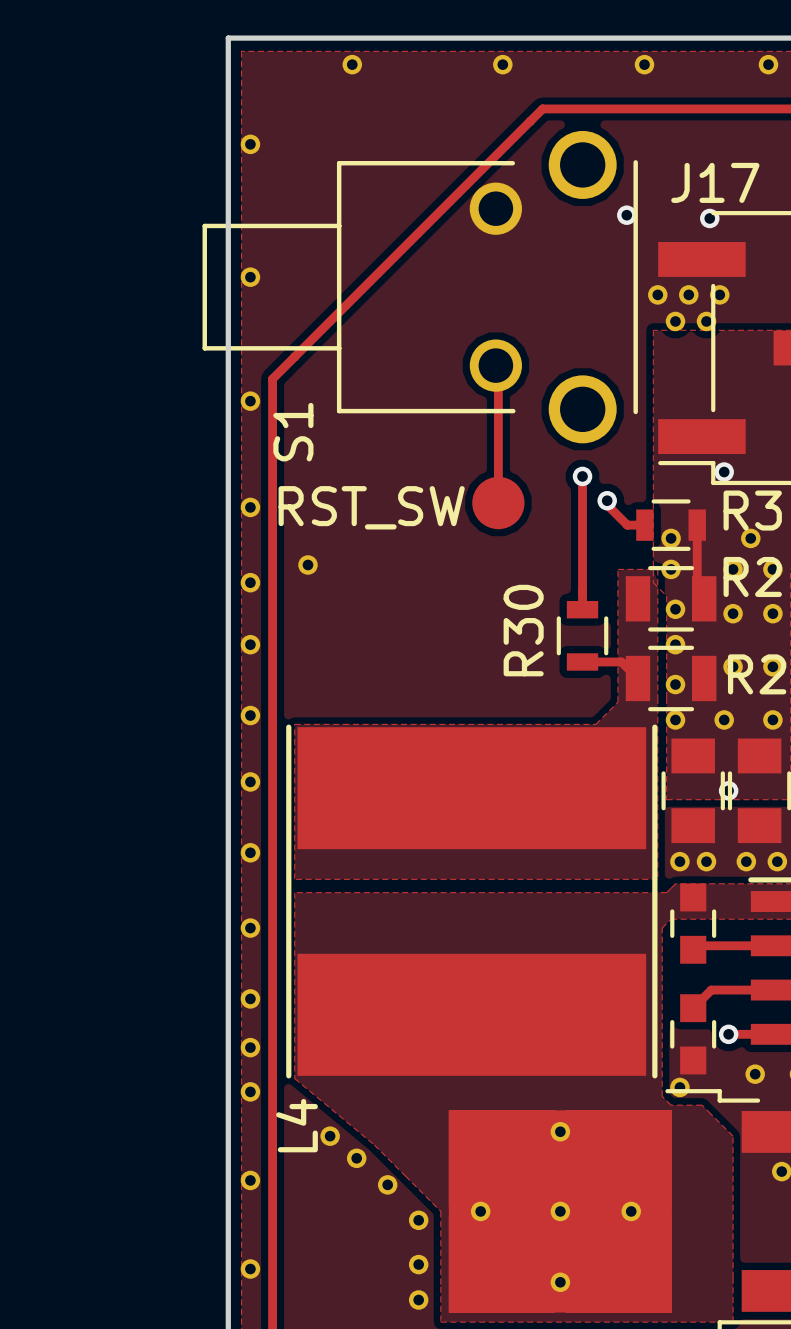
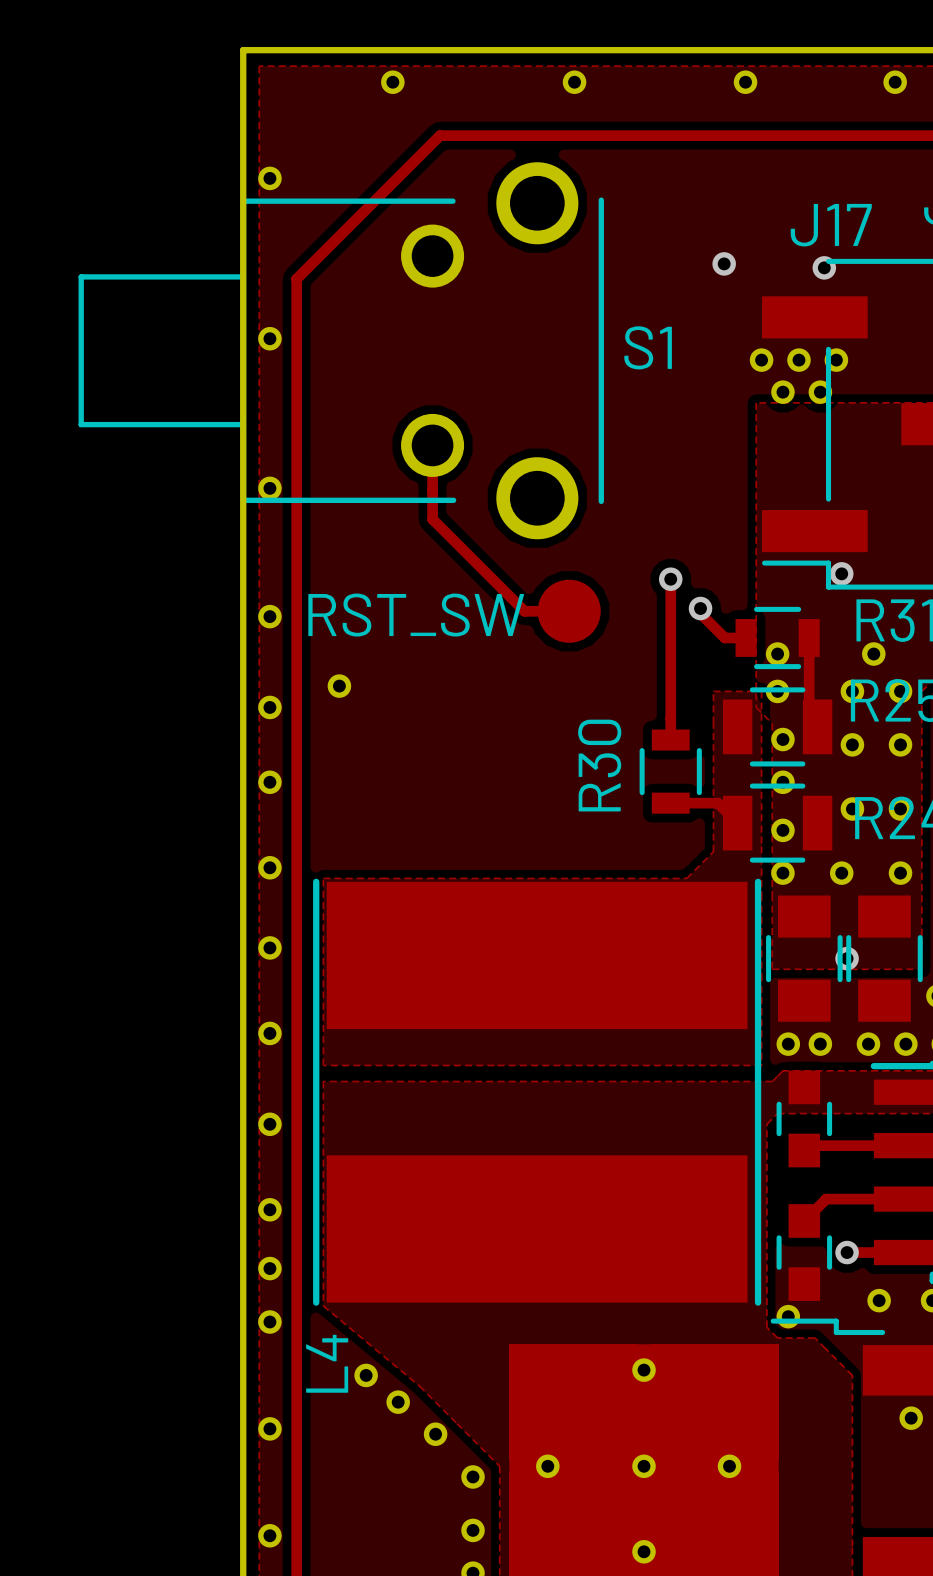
track: (542, 108) (272, 379) -> (622, 135) (440, 135) (296, 279) (296, 461)
S1 position: (420, 287) -> (341, 350)
track: (495, 365) (498, 368) (498, 503) -> (432, 445) (432, 519) (524, 611) (569, 611)
S1 name rotation: 0° (293, 432) -> 90° clockwise (648, 347)
S1 name position: S1 (293, 432) -> S1 (648, 347)

